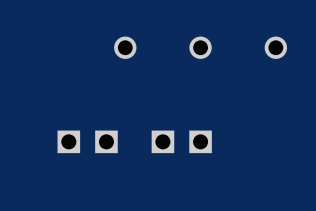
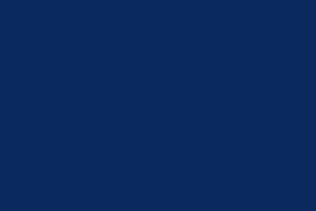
part: (125, 47) -> none
part: (200, 47) -> none
part: (275, 47) -> none
part: (87, 141) -> none
part: (181, 141) -> none

